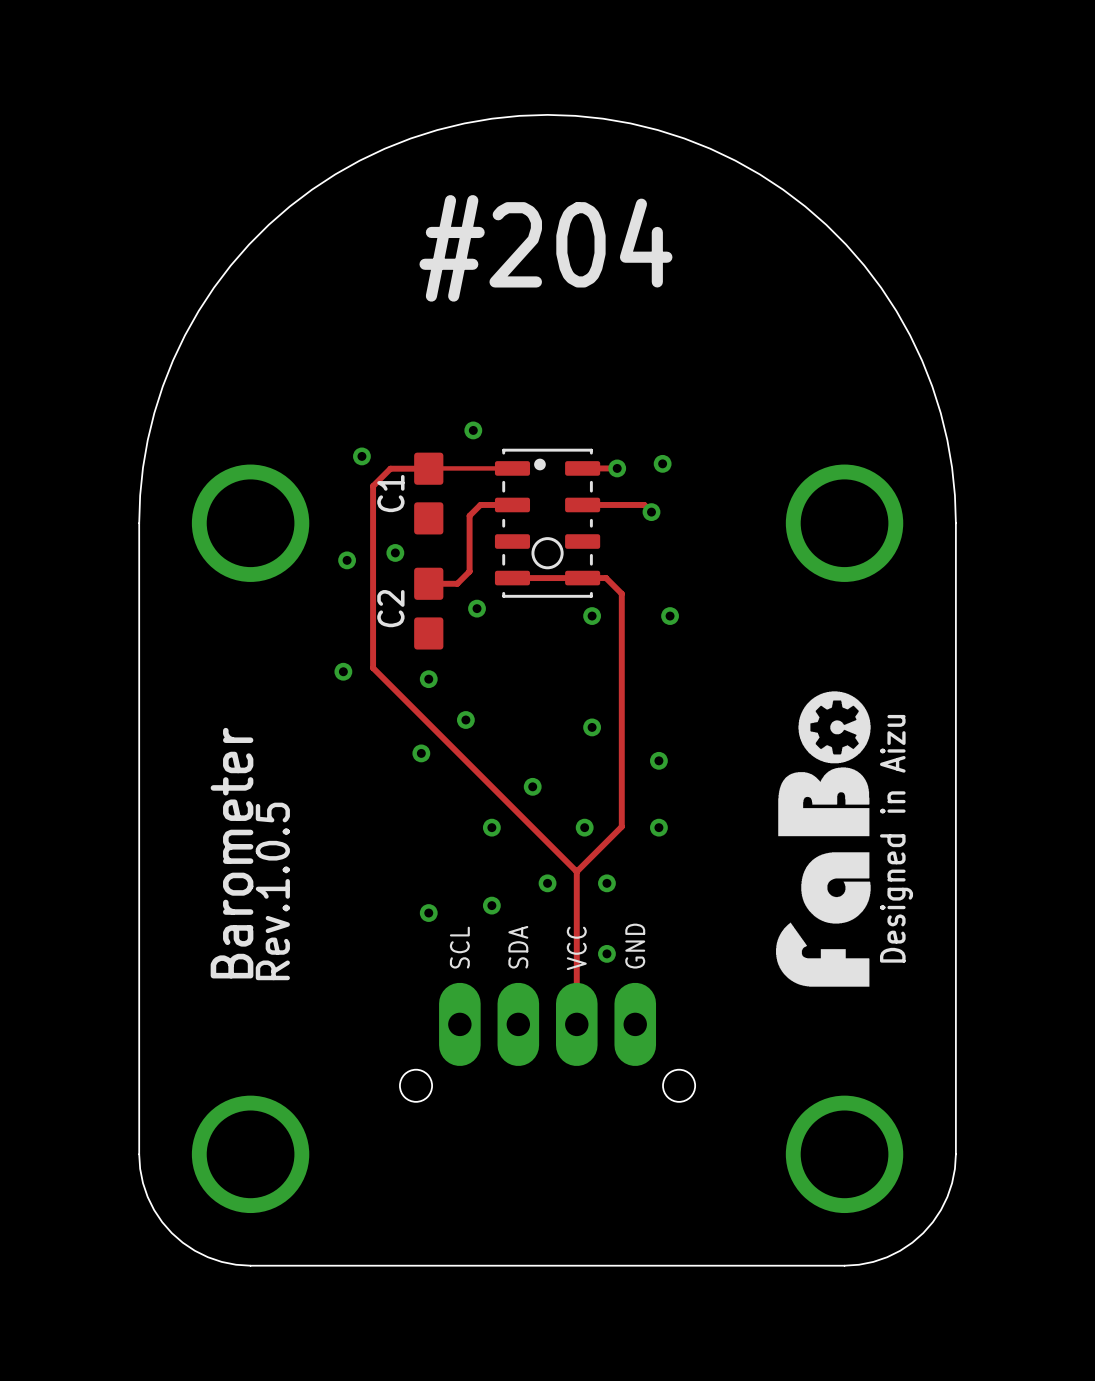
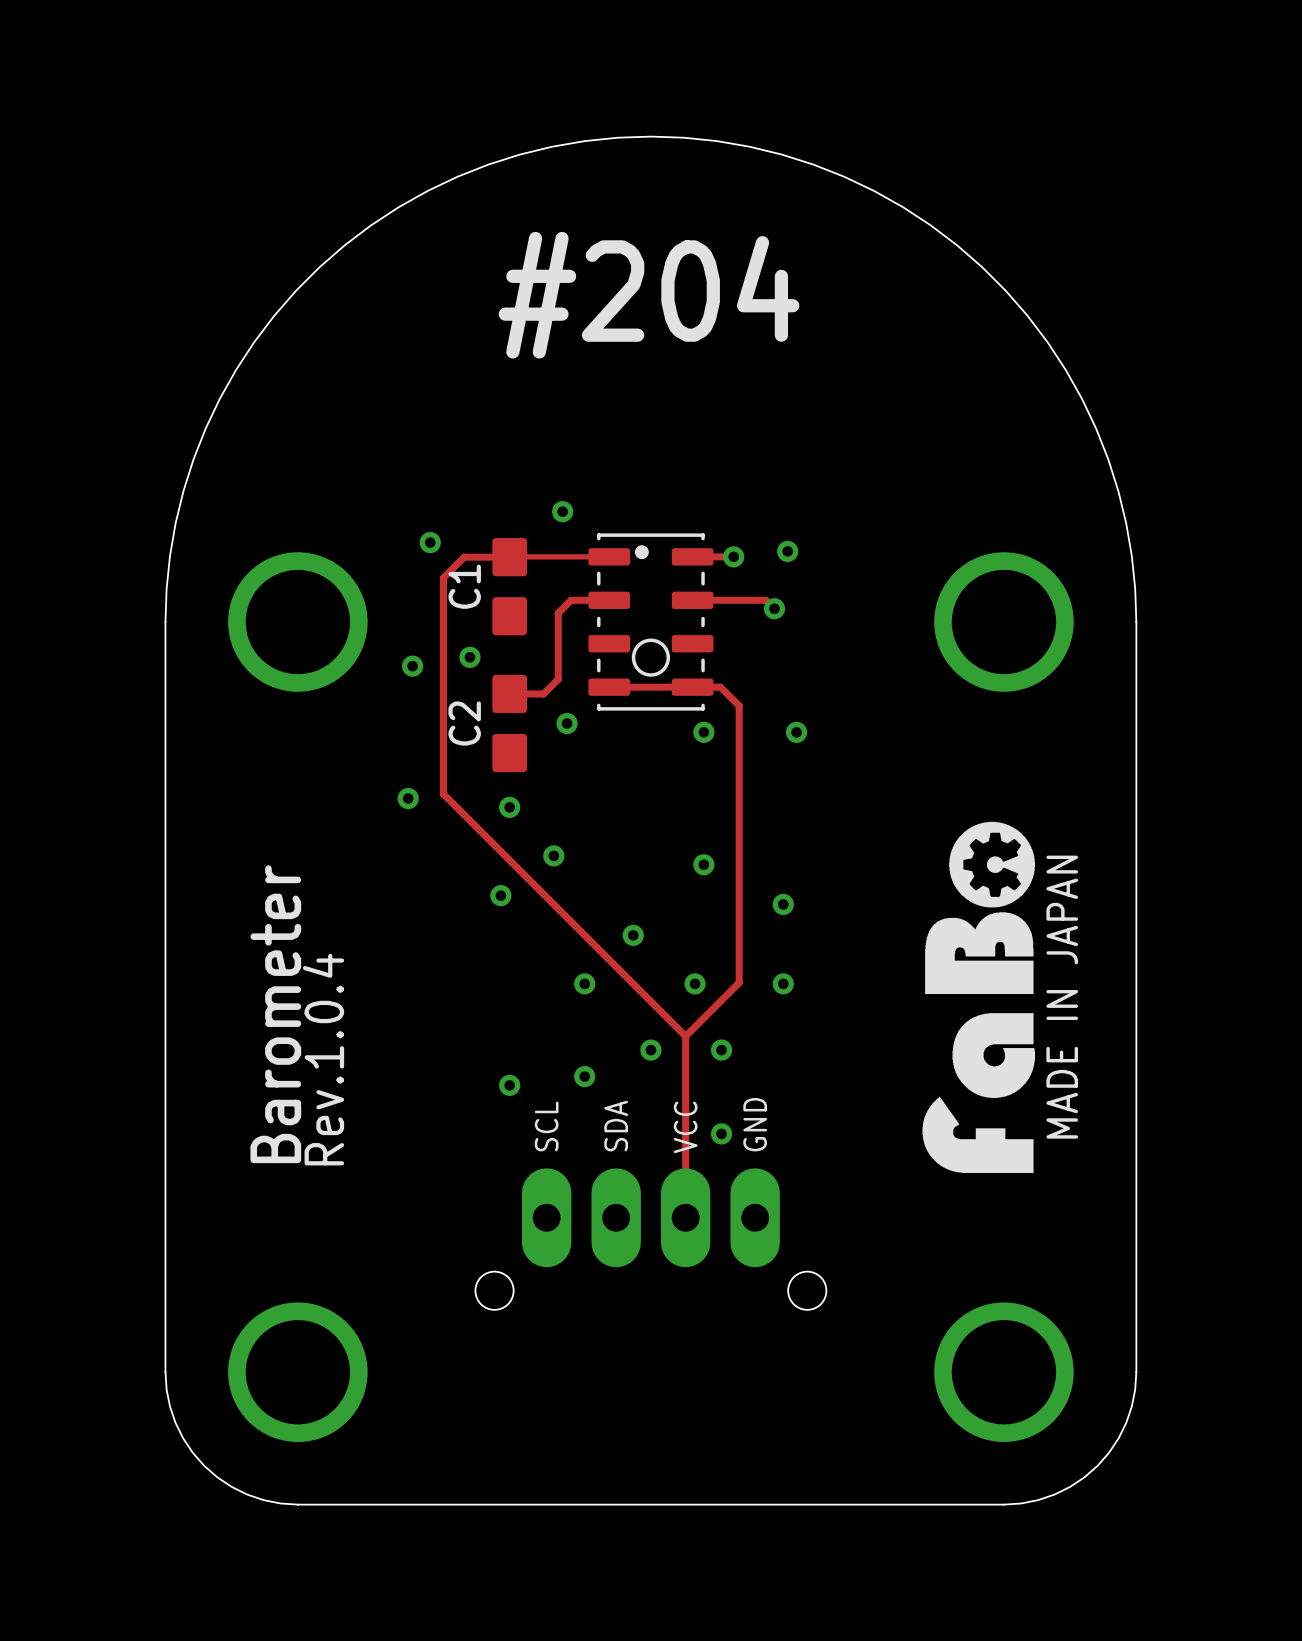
text: Designed in Aizu (896, 838) -> MADE IN JAPAN (1062, 997)
text: Rev.1.0.5 (272, 891) -> Rev.1.0.4 (323, 1059)

